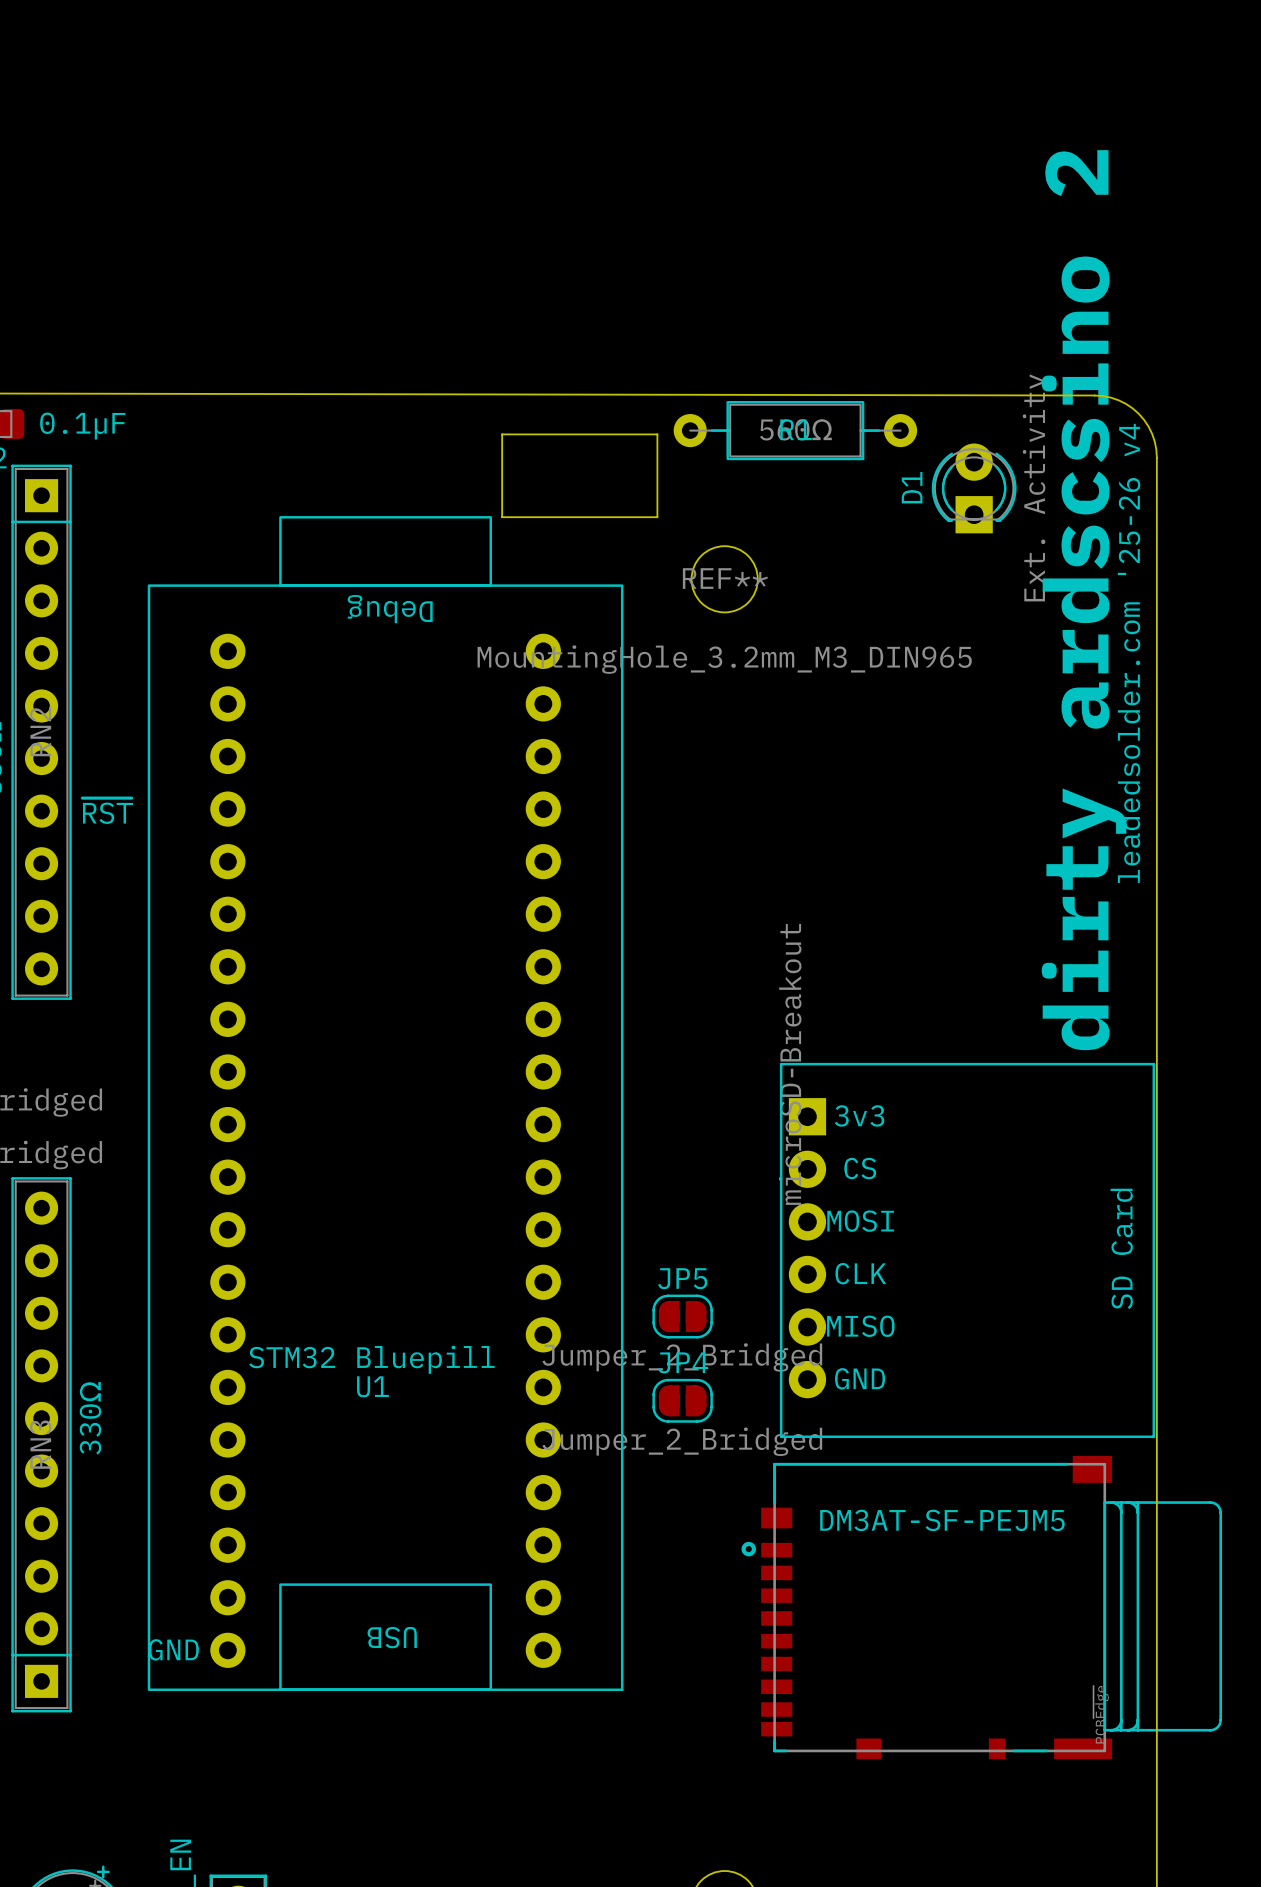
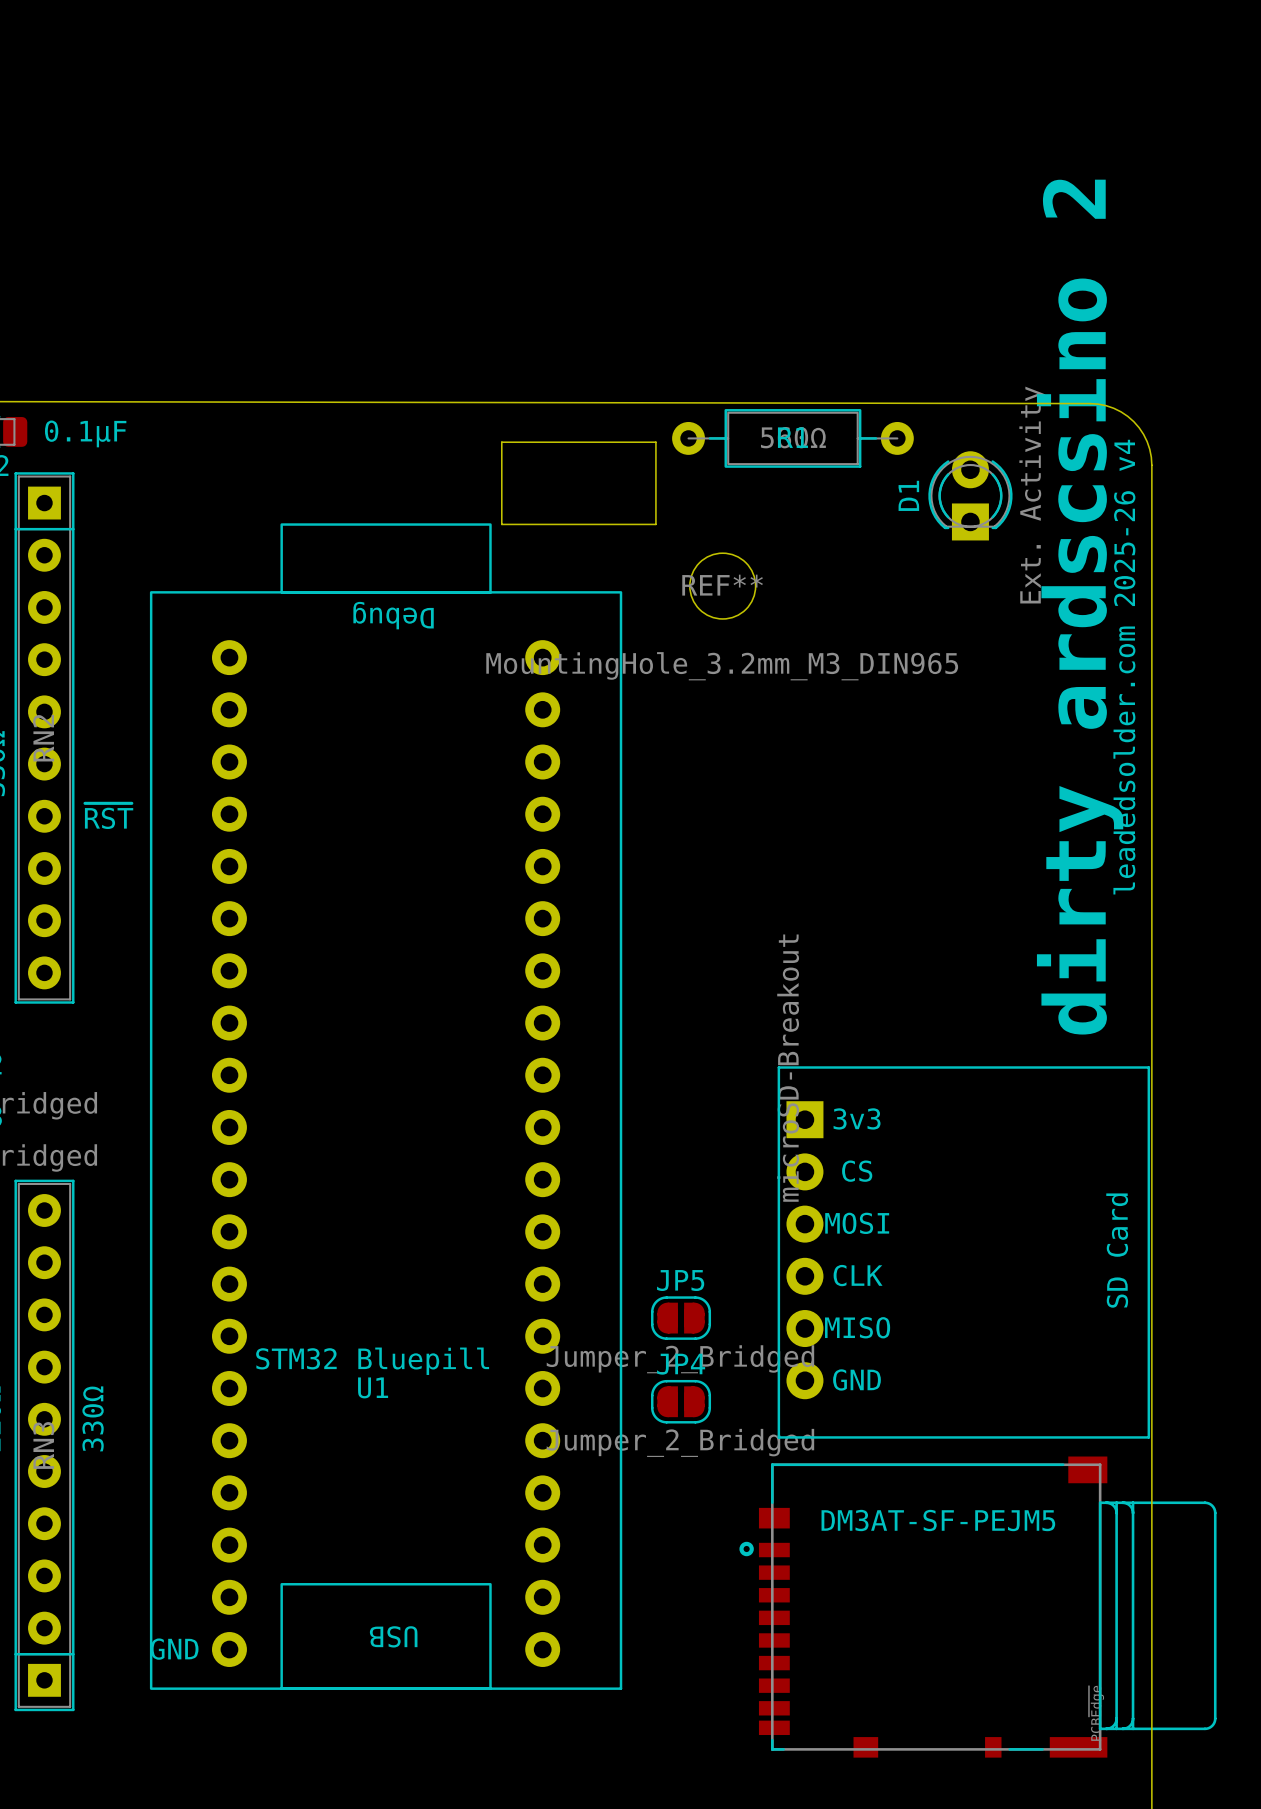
text position: dirty ardscsino 2 (1084, 600) -> dirty ardscsino 2 (1080, 607)
text: leadedsolder.com '25-26 v4 (1129, 653) -> leadedsolder.com 2025-26 v4 (1124, 667)

